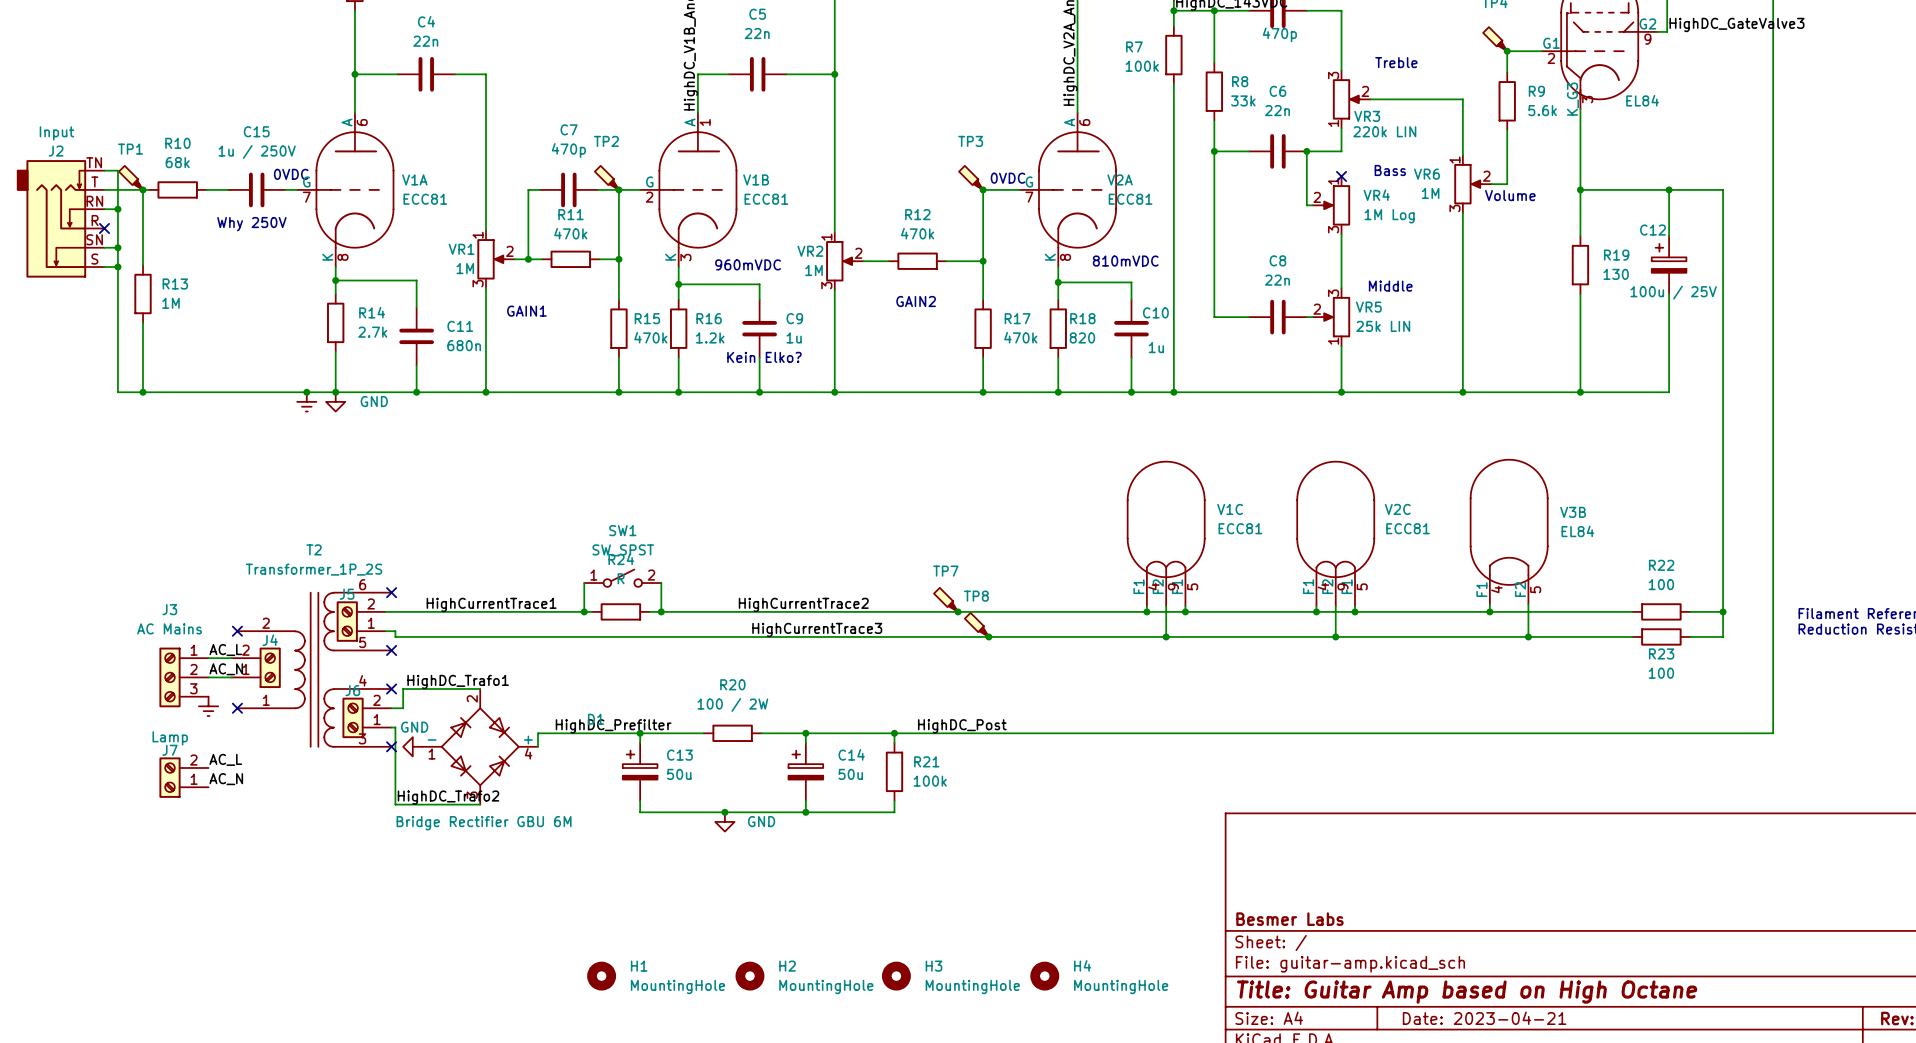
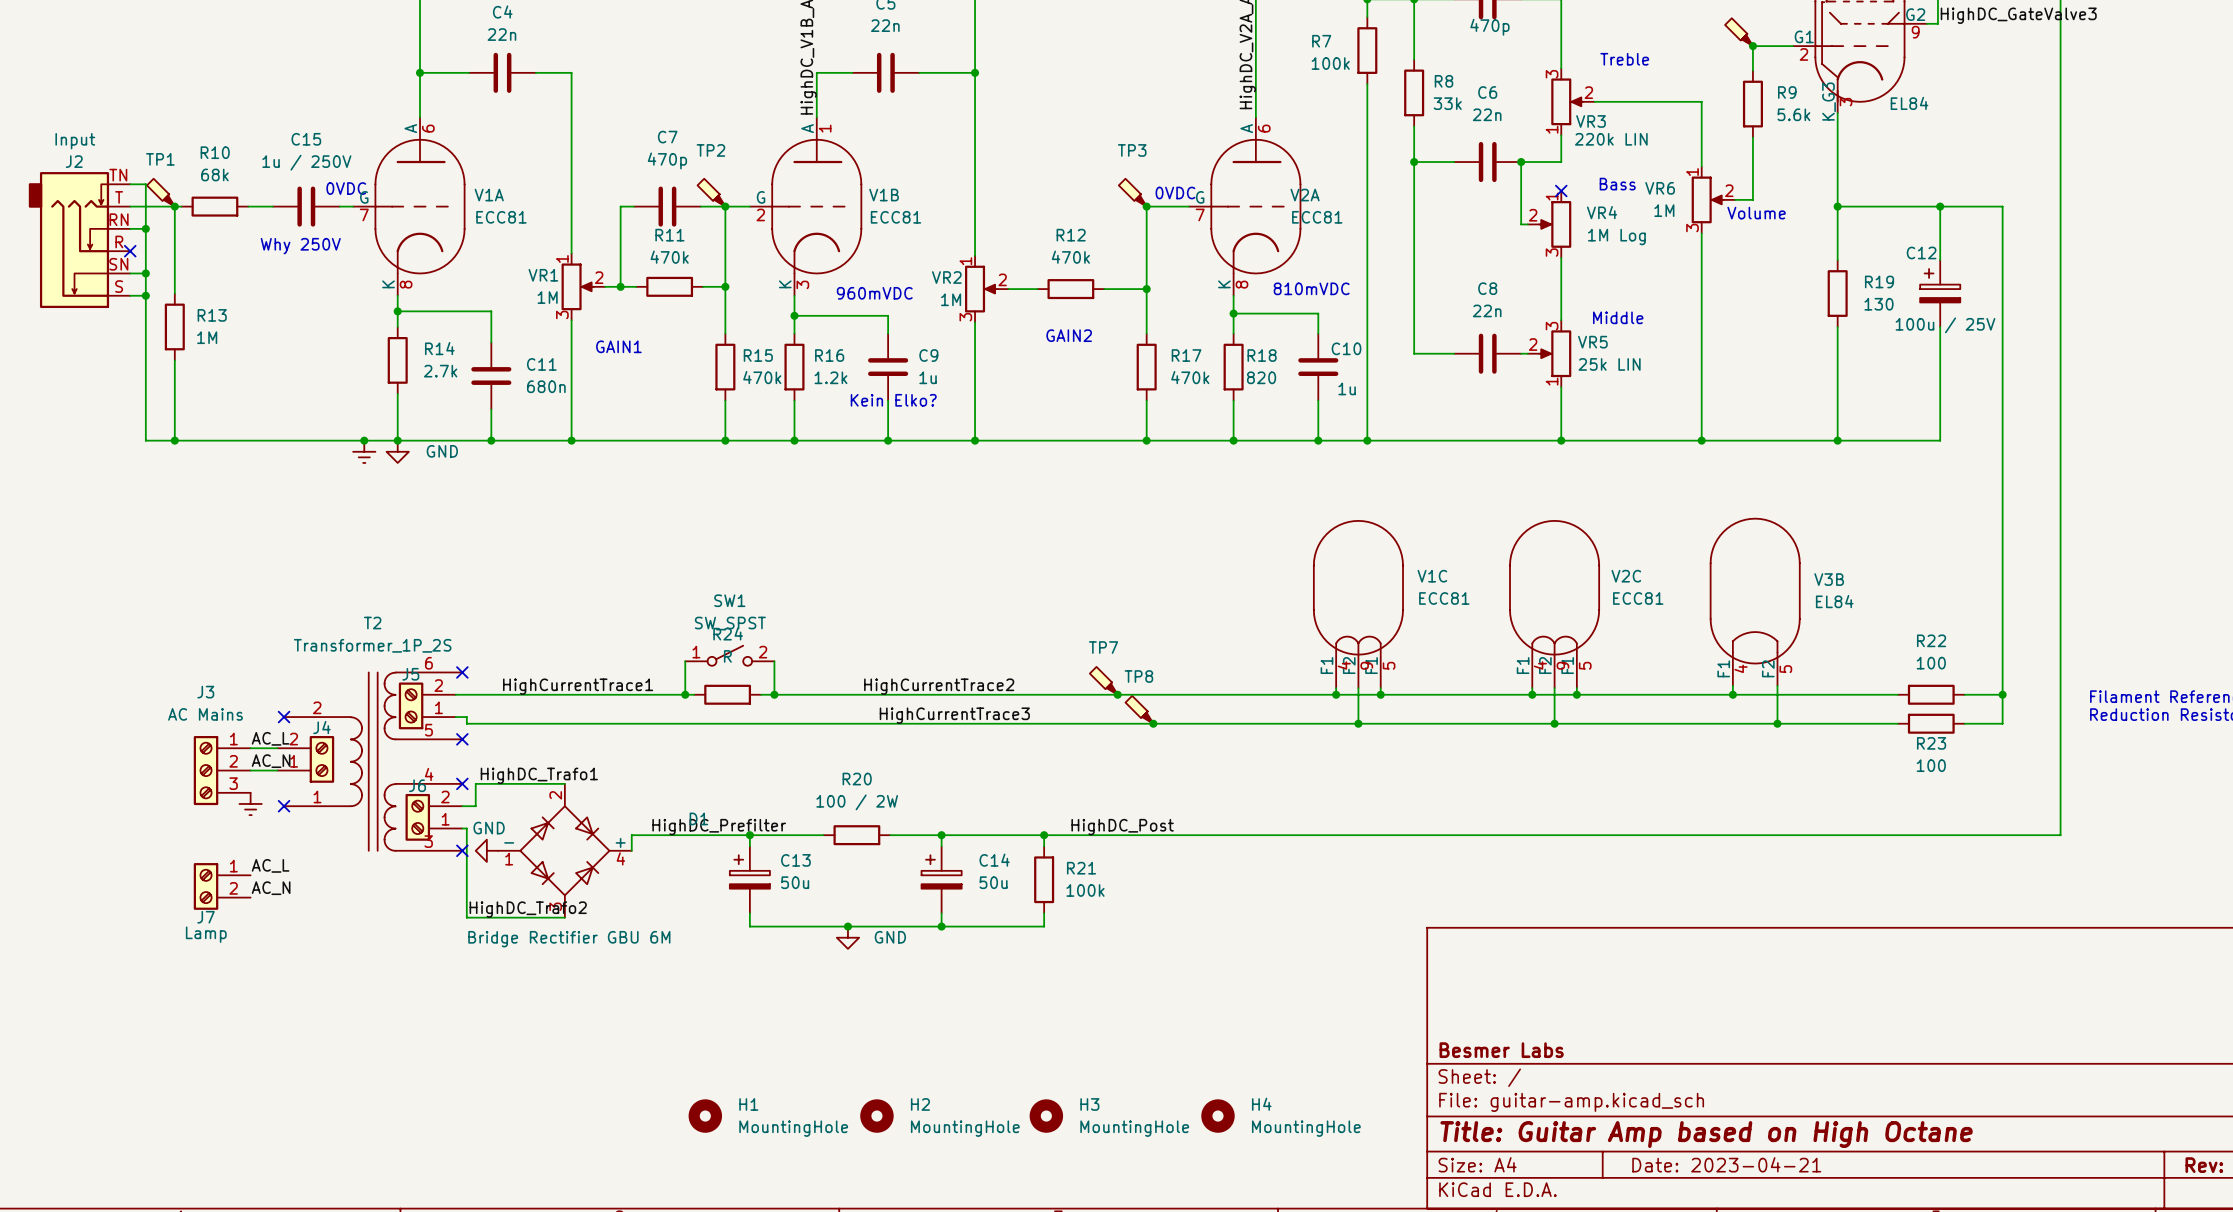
J7 flip: as is (169, 777) -> up-down (206, 886)

